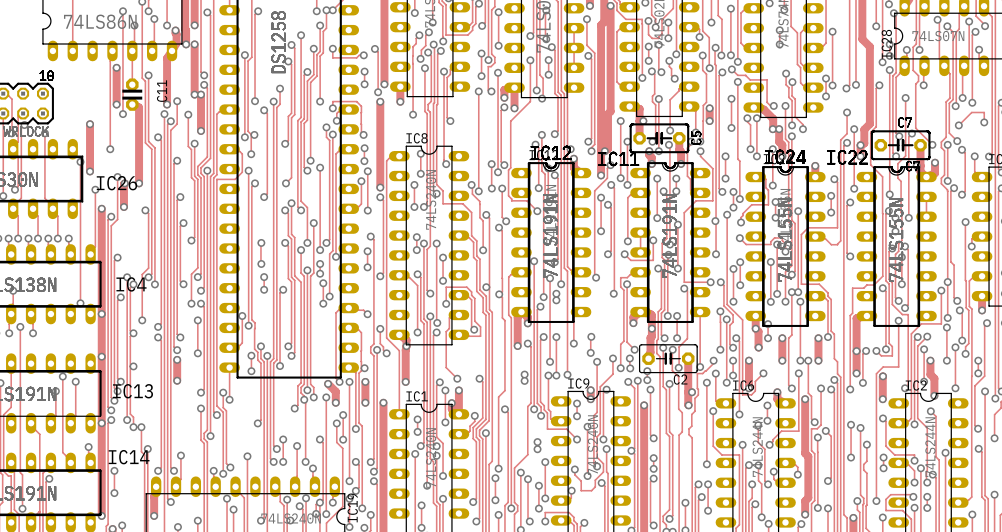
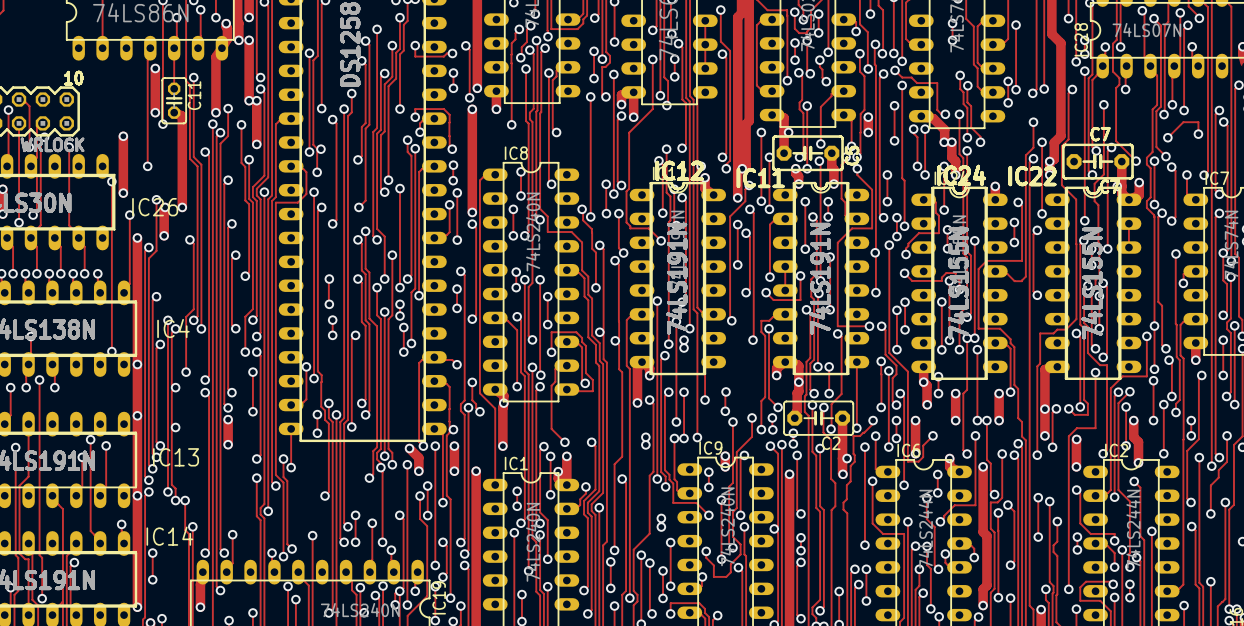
C11 footprint: [122, 78, 143, 111] -> [161, 77, 187, 125]

